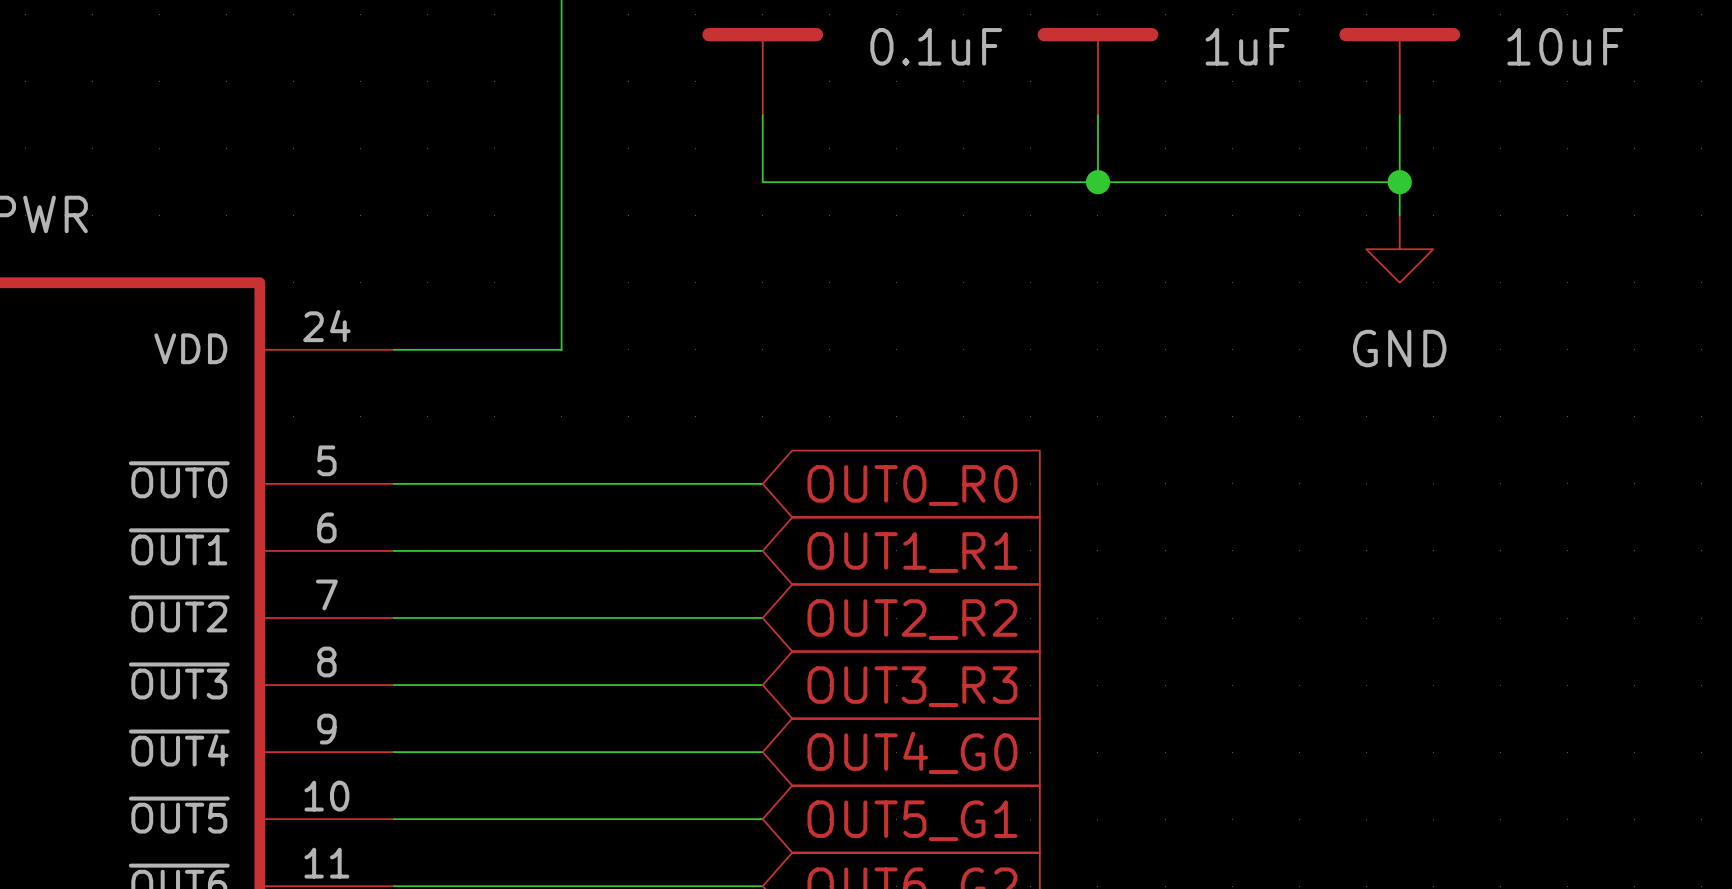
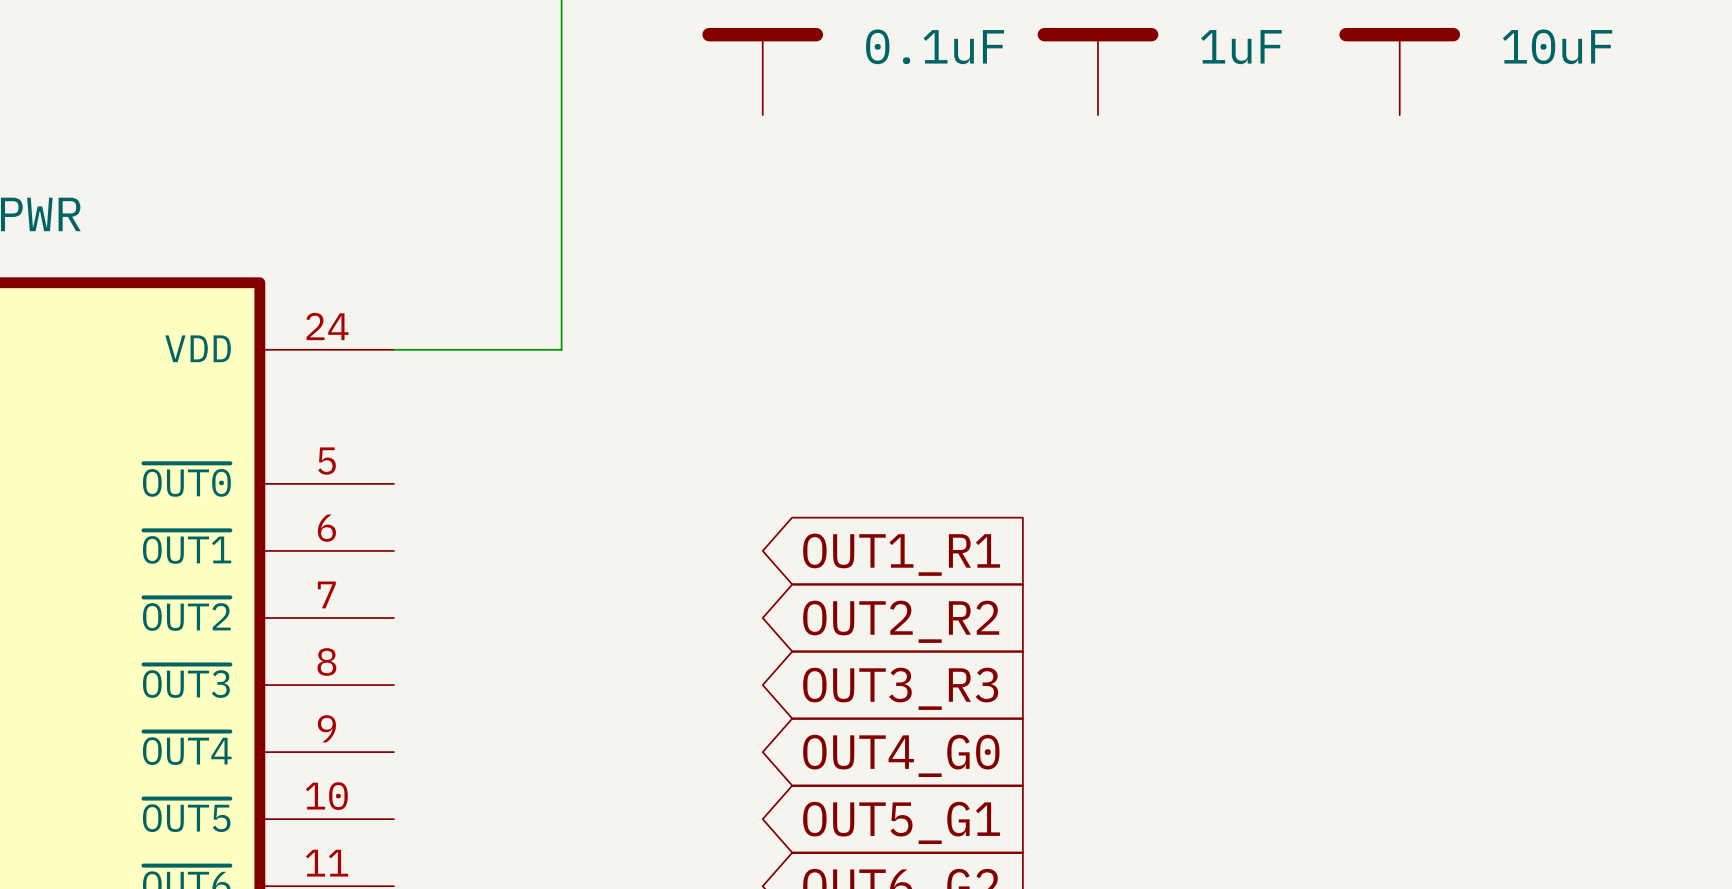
wire: (762, 115) (762, 182) (1399, 182) -> none
wire: (1097, 115) (1097, 182) -> none
wire: (1399, 115) (1399, 215) -> none
junction: (1097, 182) -> none
junction: (1399, 182) -> none
power symbol: GND (1399, 249) -> none
wire: (393, 483) (762, 483) -> none
global label: OUT0_R0 (912, 485) -> none
wire: (393, 550) (762, 550) -> none
wire: (393, 618) (762, 618) -> none
wire: (393, 685) (762, 685) -> none
wire: (393, 752) (762, 752) -> none
wire: (393, 819) (762, 819) -> none
wire: (393, 886) (762, 886) -> none

